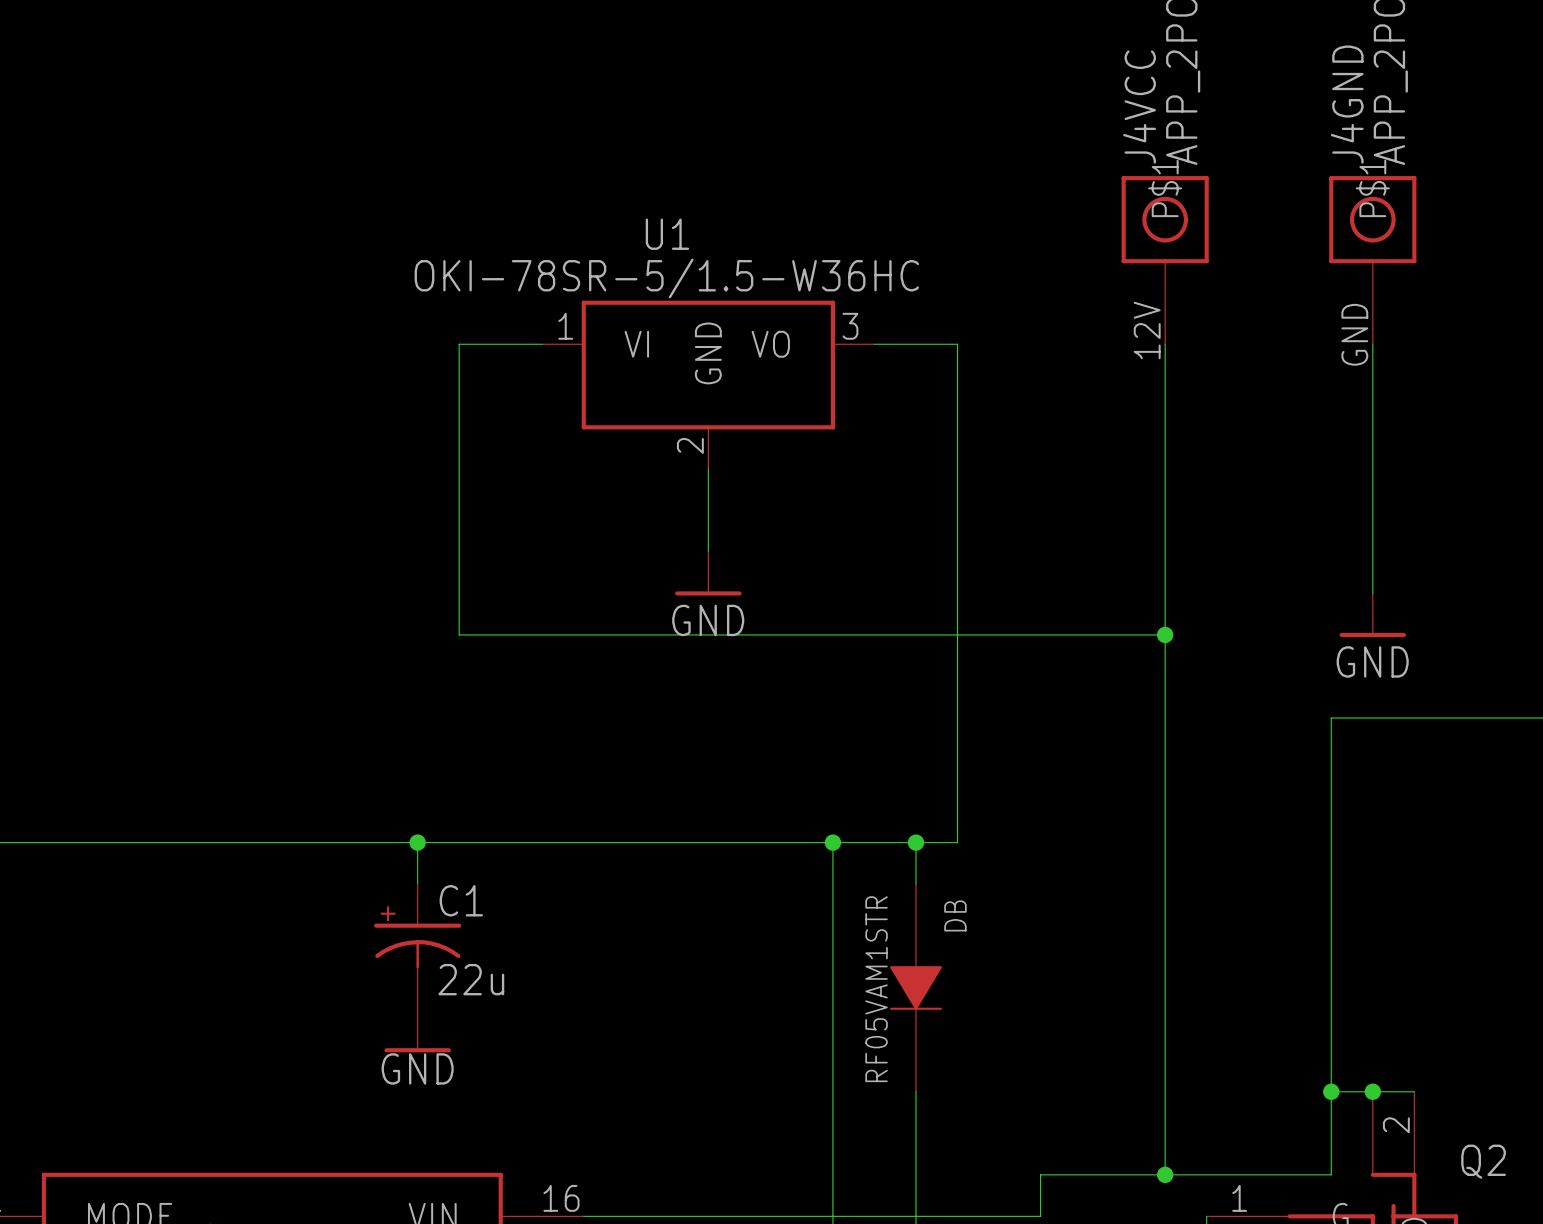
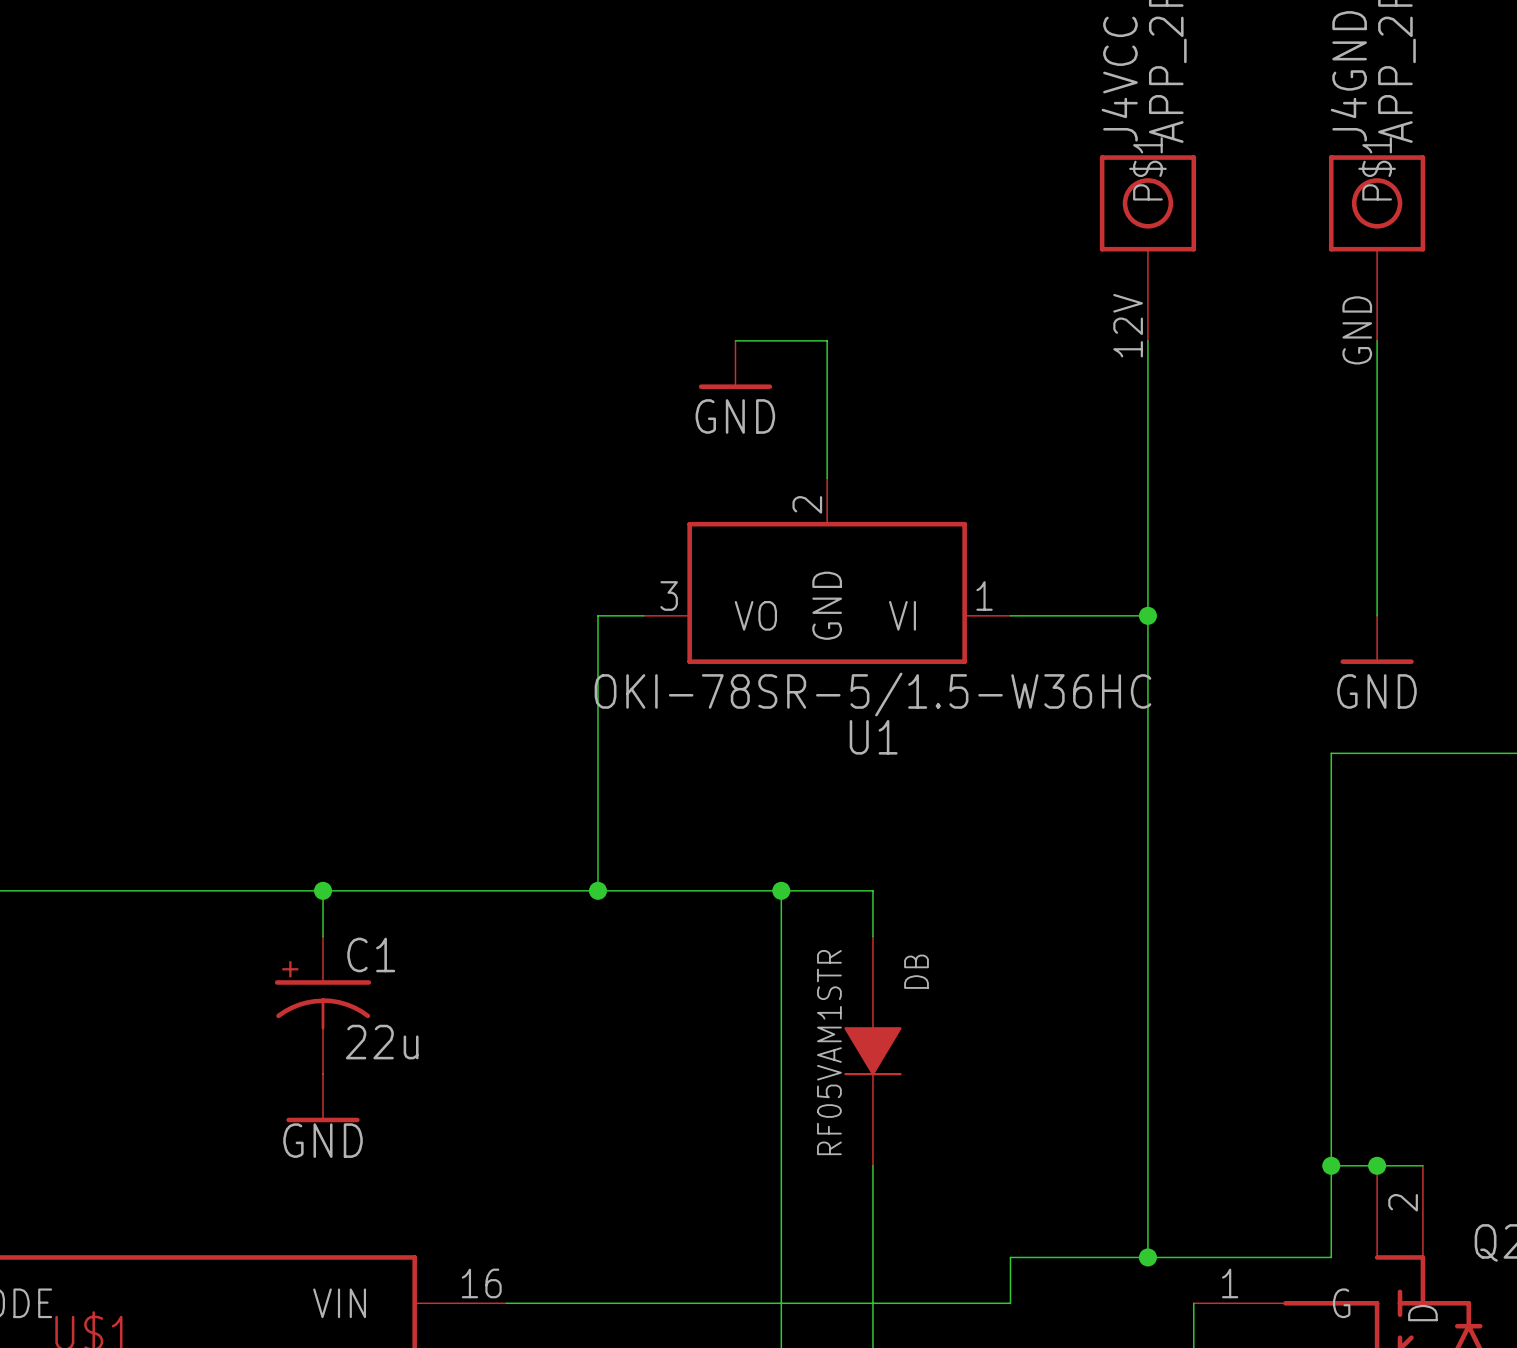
wire: (542, 344) (459, 344) (459, 634) (1165, 634) -> none
wire: none -> (735, 340) (827, 340) (827, 478)
wire: (874, 344) (957, 344) (957, 842) (916, 842) -> none
U1 rotation: 0° (708, 365) -> 180° (827, 592)
U1 position: (708, 384) -> (827, 571)
wire: (708, 468) (708, 551) -> none
power symbol position: GND (708, 573) -> GND (735, 364)
wire: none -> (643, 615) (597, 615) (597, 890)
wire: none -> (1010, 615) (1147, 615)
junction position: (1165, 634) -> (1147, 615)
junction: none -> (597, 890)
junction: (916, 842) -> none

